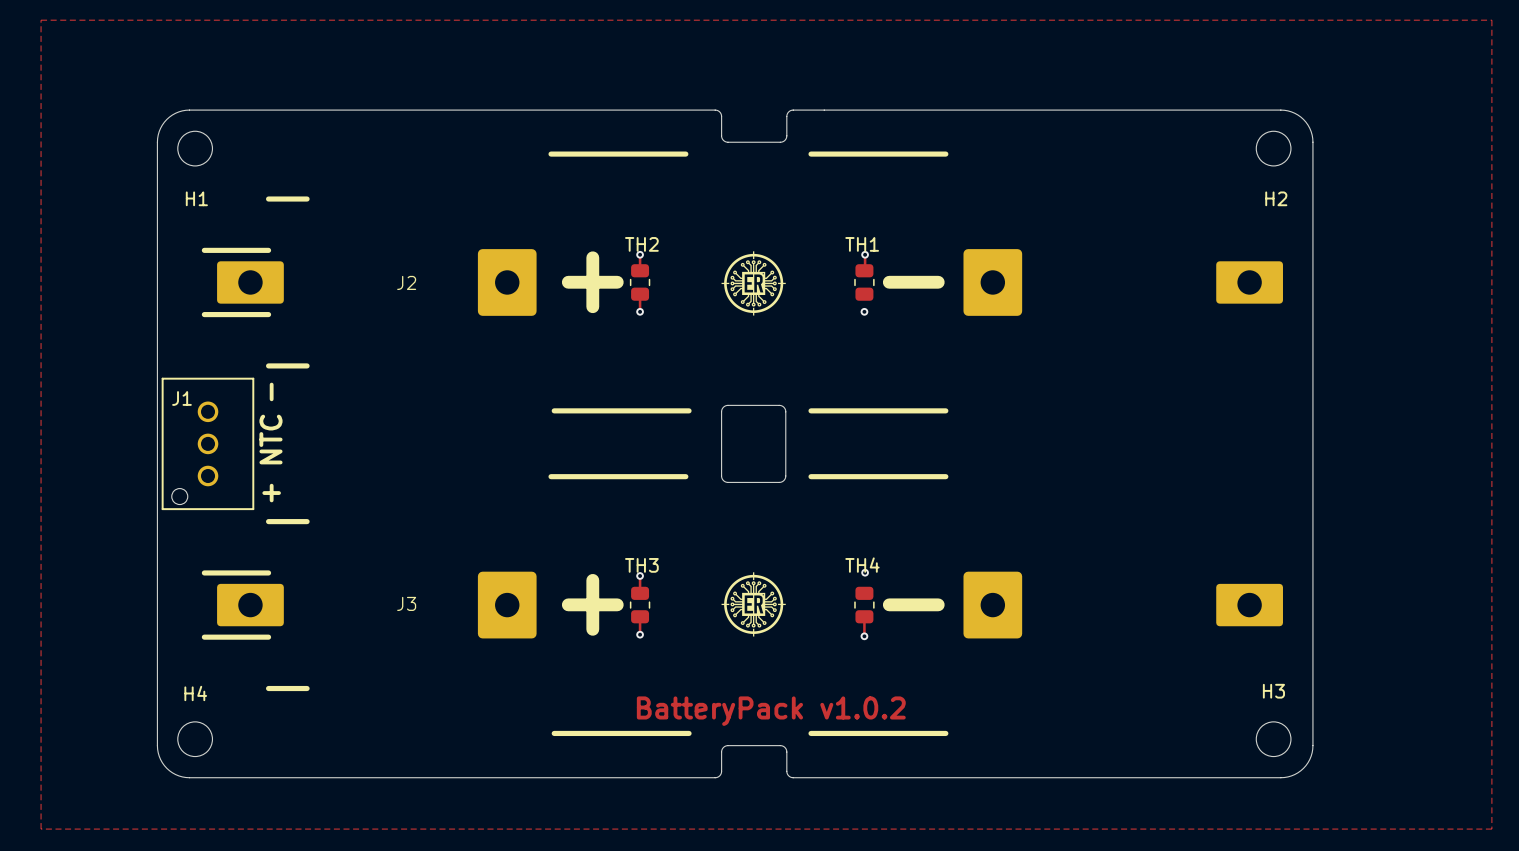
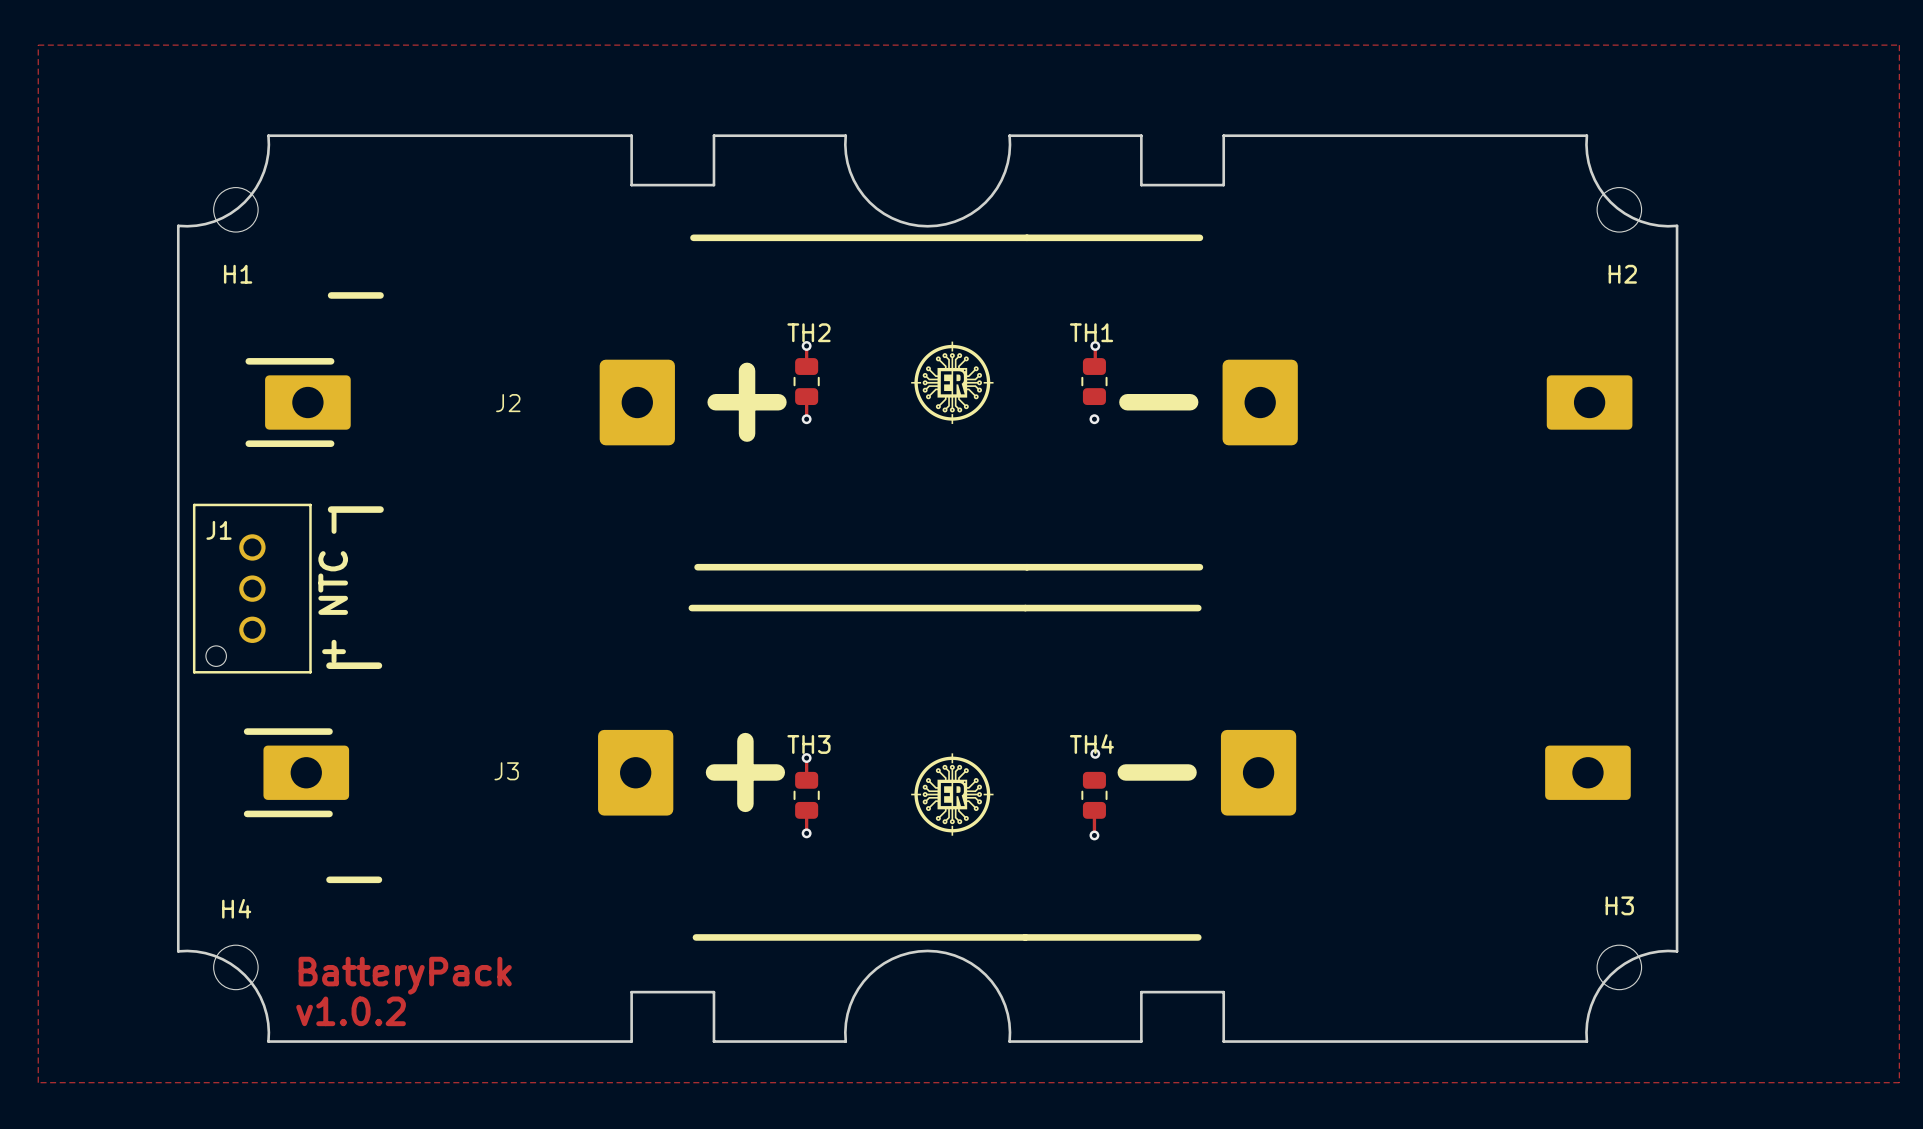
board edge: (189, 110) (715, 110) (721, 114) (721, 137) (728, 142) (783, 141) (786, 136) (787, 114) (793, 110) (1280, 110) (1297, 115) (1309, 128) (1312, 142) (1312, 745) (1308, 762) (1297, 772) (1280, 777) (793, 777) (787, 772) (786, 751) (782, 746) (728, 745) (722, 749) (721, 772) (715, 777) (189, 777) (172, 772) (162, 762) (157, 745) (157, 142) (160, 128) (166, 119) (178, 111) (189, 110) -> (268, 135) (268, 153) (264, 171) (256, 187) (244, 202) (230, 213) (214, 221) (196, 225) (178, 225) (178, 951) (196, 951) (214, 955) (230, 963) (244, 975) (256, 989) (264, 1005) (268, 1023) (268, 1041) (631, 1041) (631, 992) (713, 992) (713, 1041) (845, 1041) (847, 1014) (853, 996) (863, 981) (876, 968) (892, 958) (909, 952) (927, 950) (954, 955) (971, 963) (985, 974) (997, 988) (1005, 1005) (1009, 1023) (1009, 1041) (1141, 1041) (1141, 992) (1223, 992) (1223, 1041) (1586, 1041) (1587, 1023) (1591, 1005) (1599, 989) (1610, 975) (1624, 963) (1641, 955) (1658, 951) (1677, 951) (1677, 225) (1658, 225) (1641, 221) (1624, 213) (1610, 202) (1599, 187) (1591, 171) (1587, 153) (1586, 135) (1223, 135) (1223, 185) (1141, 185) (1141, 135) (1009, 135) (1009, 154) (1005, 171) (991, 195) (978, 208) (963, 218) (945, 224) (927, 226) (909, 224) (892, 218) (869, 202) (858, 188) (850, 171) (845, 154) (845, 135) (713, 135) (713, 185) (631, 185) (631, 135) (268, 135)
J2 footprint: [201, 151, 1283, 414] -> [245, 234, 1633, 571]
board edge: (728, 405) (779, 405) (784, 407) (785, 476) (783, 481) (728, 482) (722, 479) (721, 410) (723, 407) (728, 405) -> none
J3 footprint: [201, 474, 1283, 737] -> [243, 604, 1631, 941]
text: BatteryPack v1.0.2 (771, 711) -> none
text: none -> BatteryPack (405, 975)
text: none -> v1.0.2 (351, 1011)

